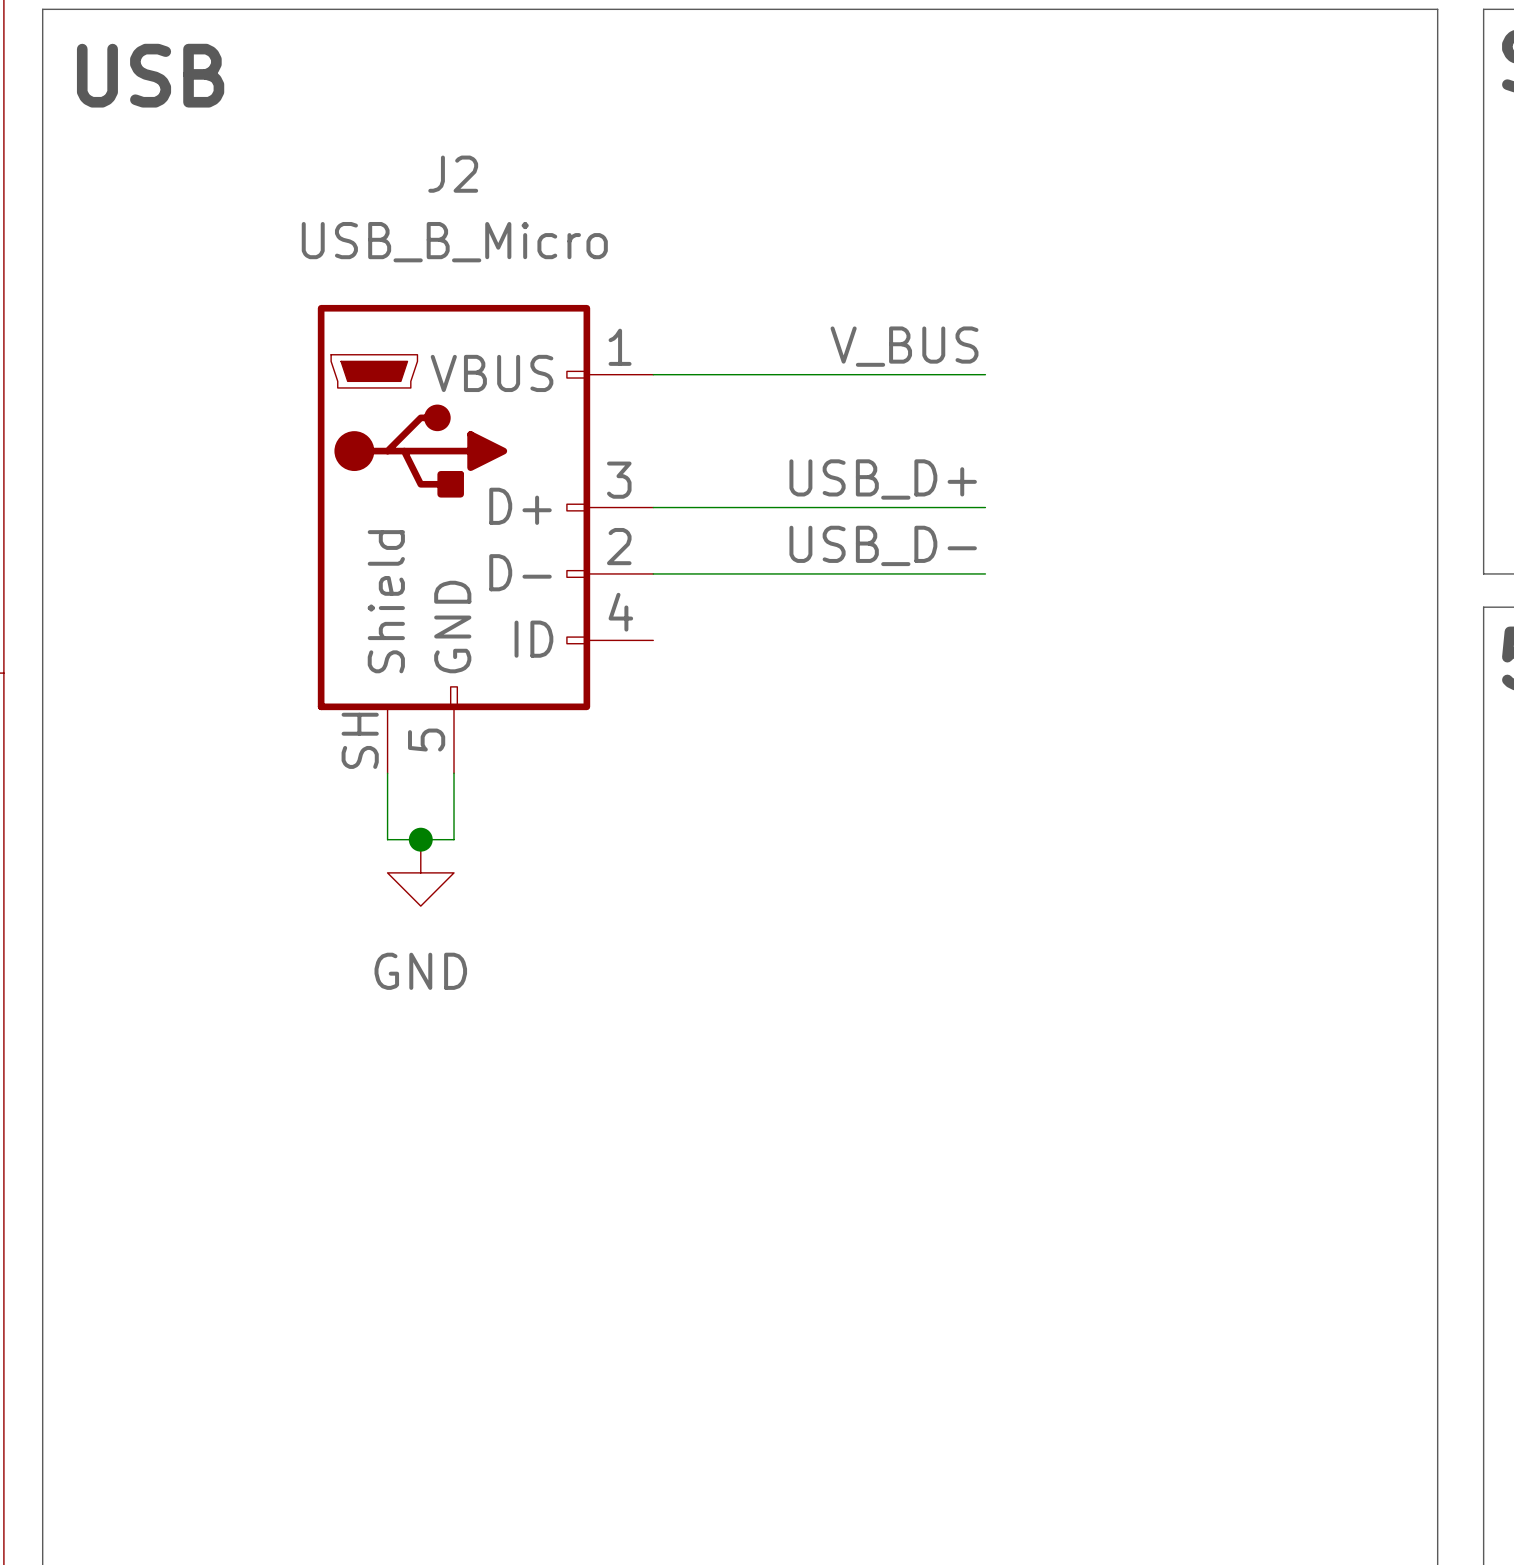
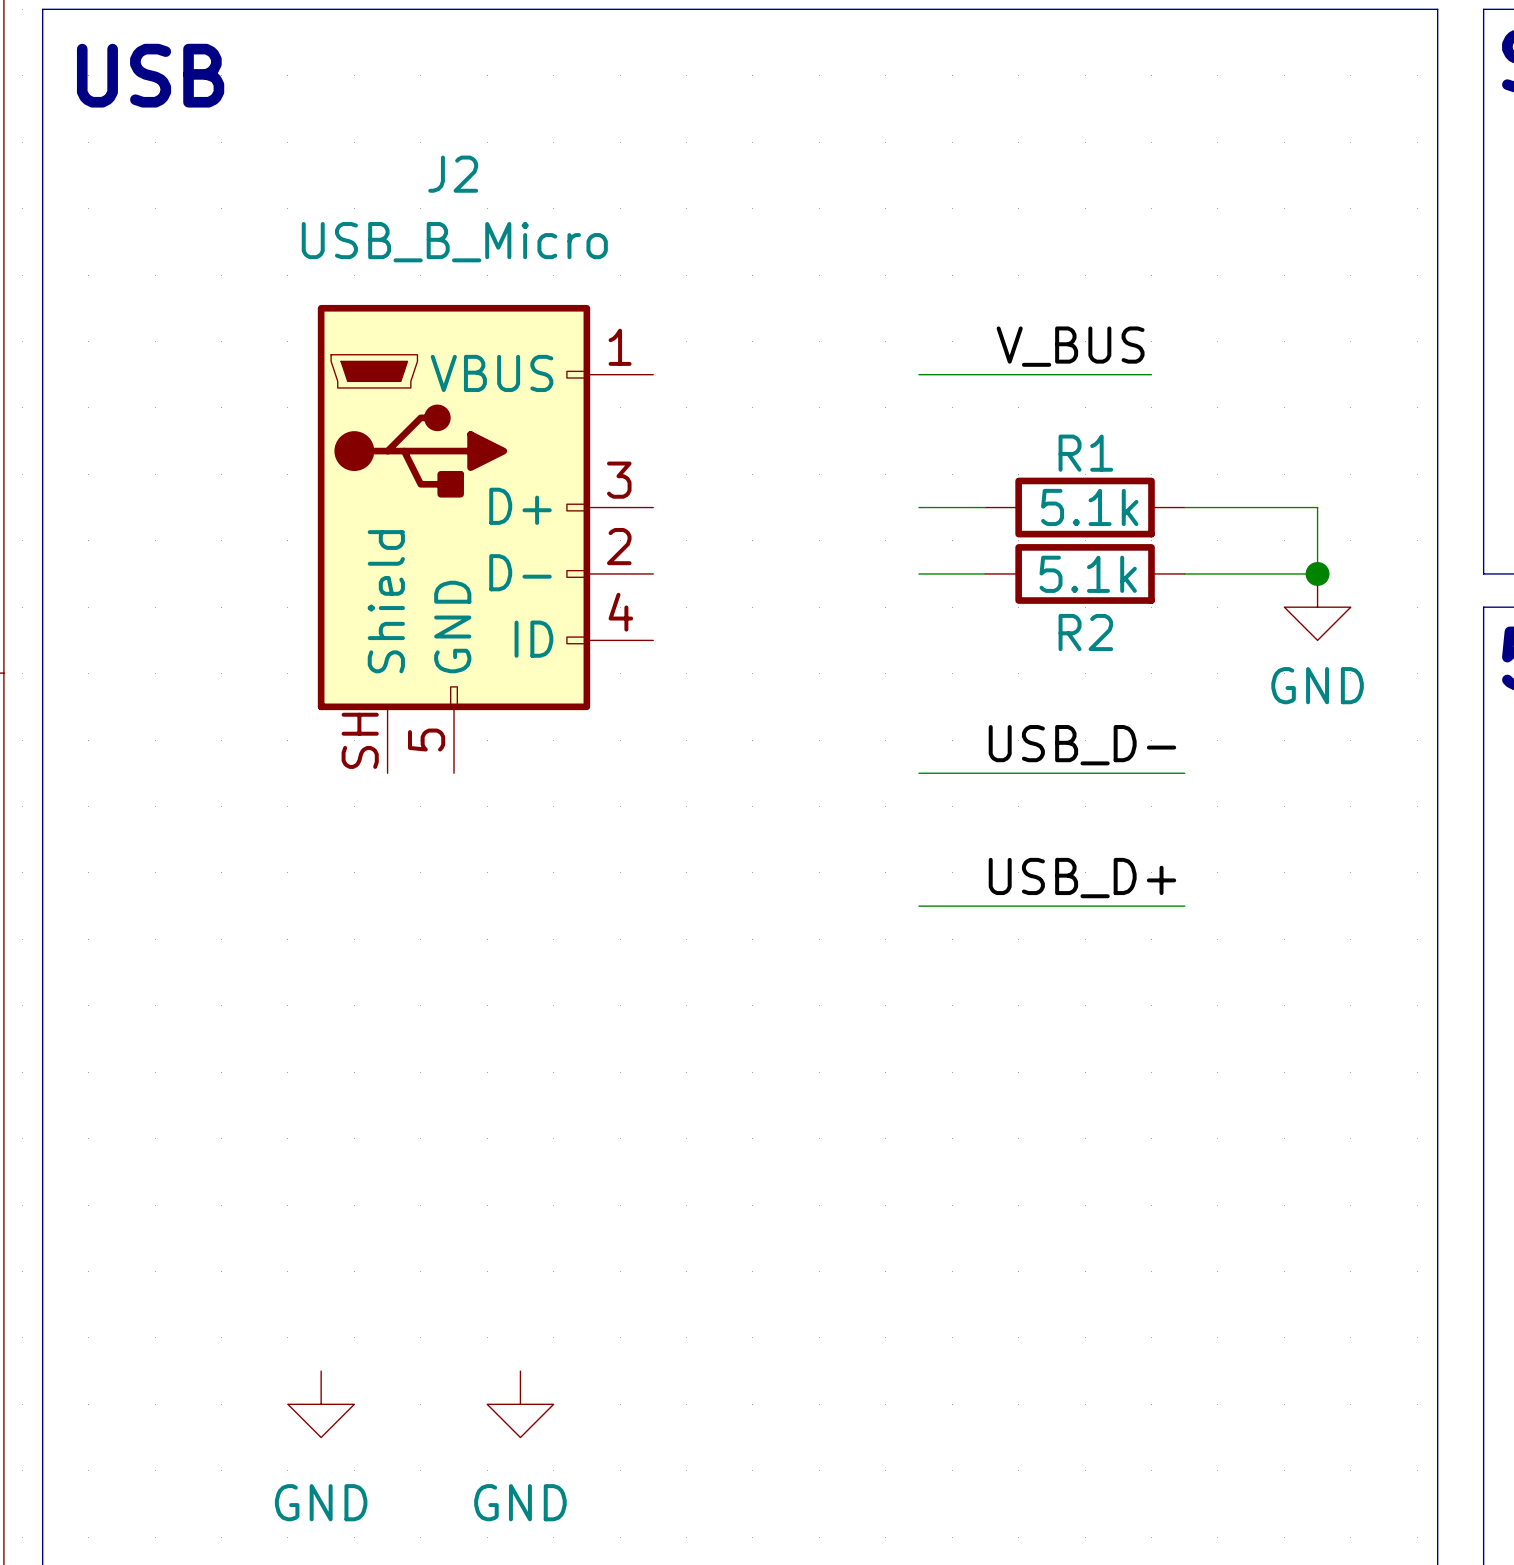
label position: V_BUS (904, 346) -> V_BUS (1070, 346)
wire: (653, 374) (918, 374) -> (918, 773) (1184, 773)
wire: none -> (985, 374) (1151, 374)
label position: USB_D+ (883, 479) -> USB_D+ (1082, 878)
wire: (653, 507) (918, 507) -> (918, 906) (1184, 906)
R1: none -> 5.1k (1085, 507)
wire: none -> (1184, 507) (1317, 507) (1317, 573) (1184, 573)
label position: USB_D- (883, 545) -> USB_D- (1082, 745)
wire: (653, 573) (918, 573) -> none
R2: none -> 5.1k (1085, 573)
junction: none -> (1317, 573)
power symbol: none -> GND (1317, 607)
wire: (387, 773) (387, 839) (454, 839) (454, 773) -> none
junction: (420, 839) -> none
power symbol: GND (420, 872) -> none
power symbol: none -> GND (321, 1404)
power symbol: none -> GND (520, 1404)

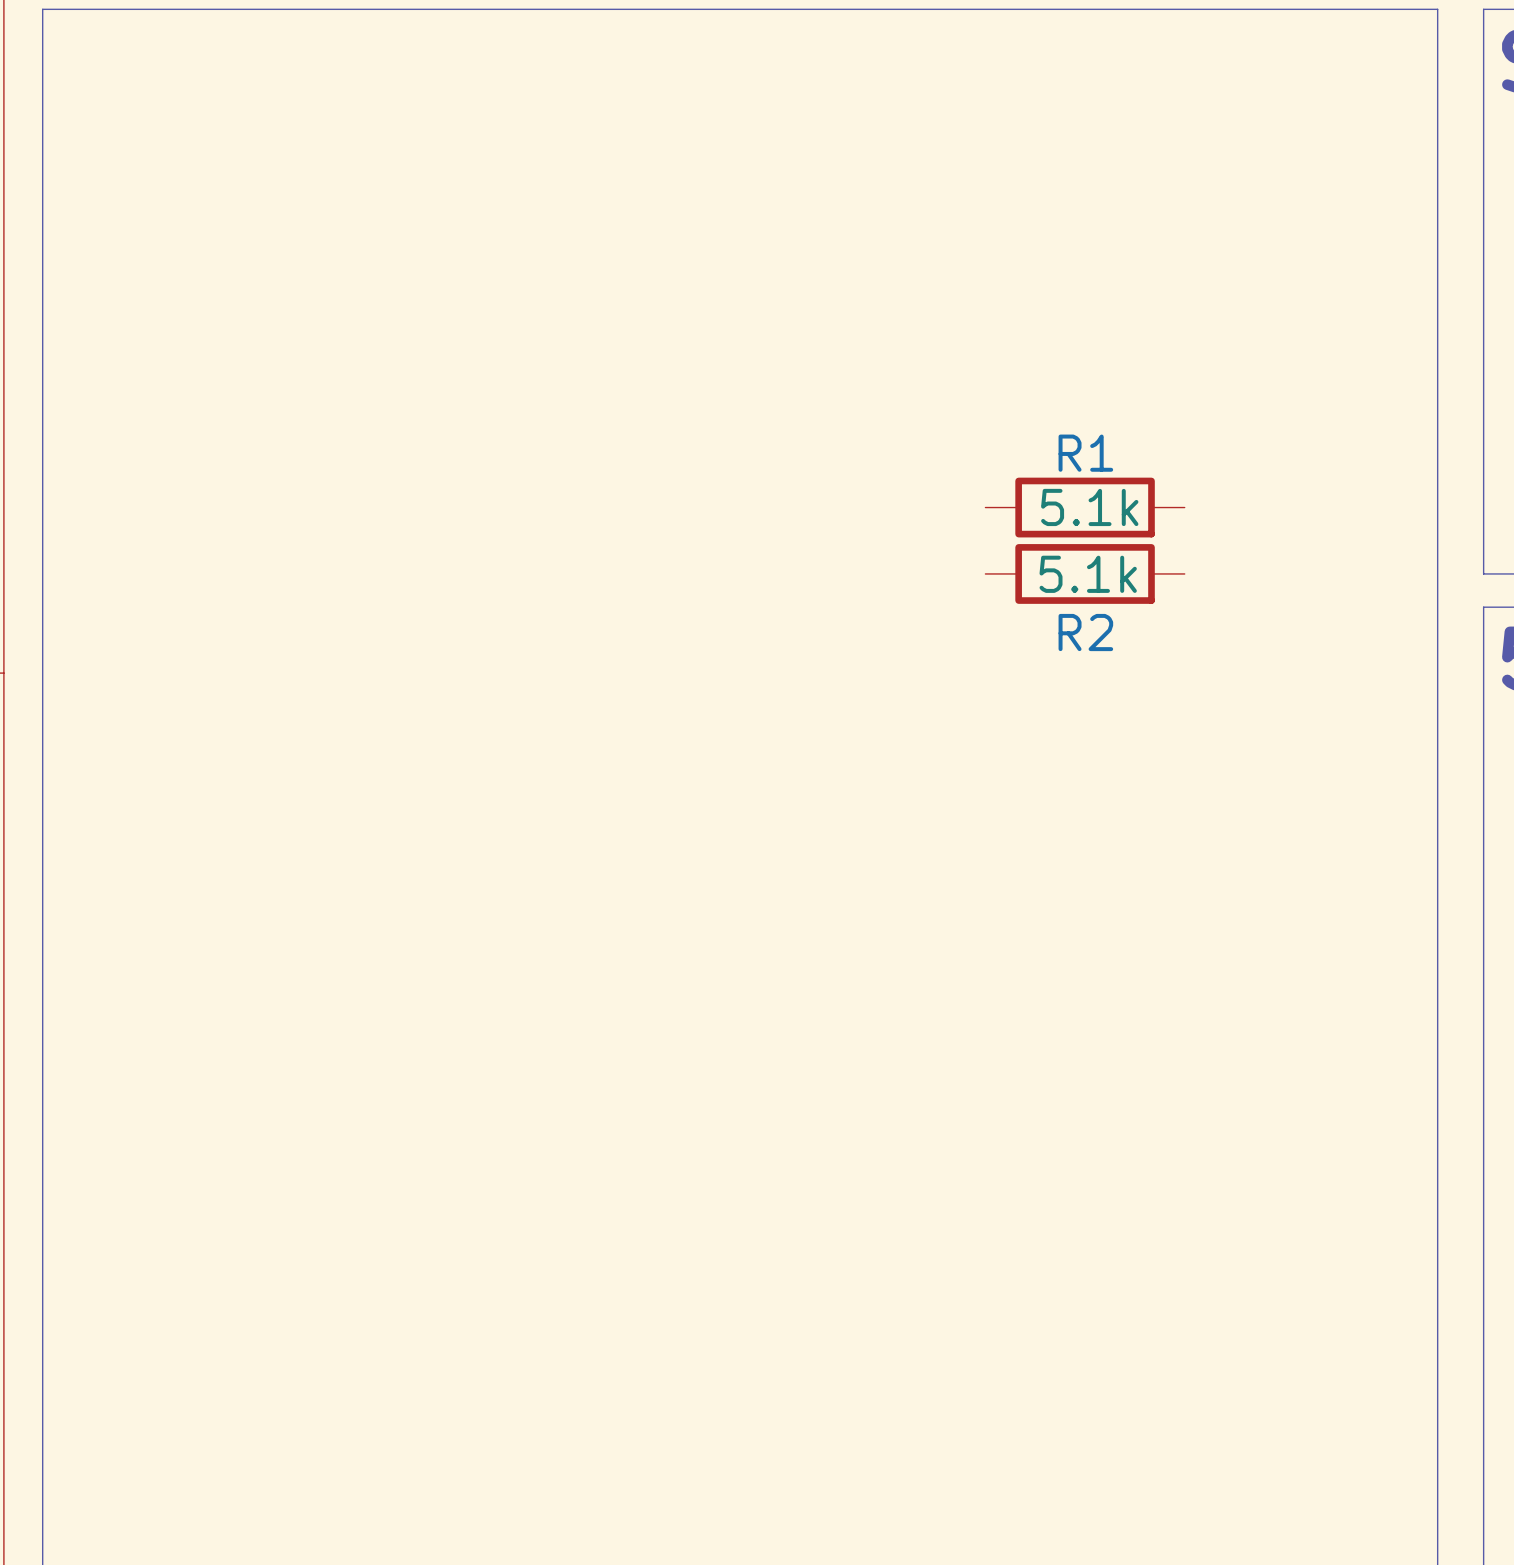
text: USB (150, 75) -> none
label: V_BUS (1070, 346) -> none
wire: (918, 374) (1151, 374) -> none
wire: (918, 507) (985, 507) -> none
wire: (1184, 507) (1317, 507) (1317, 573) (1184, 573) -> none
J2: USB_B_Micro (485, 539) -> none
wire: (918, 573) (985, 573) -> none
junction: (1317, 573) -> none
power symbol: GND (1317, 607) -> none
label: USB_D- (1082, 745) -> none
wire: (918, 773) (1184, 773) -> none
label: USB_D+ (1082, 878) -> none
wire: (918, 906) (1184, 906) -> none
power symbol: GND (321, 1404) -> none
power symbol: GND (520, 1404) -> none

